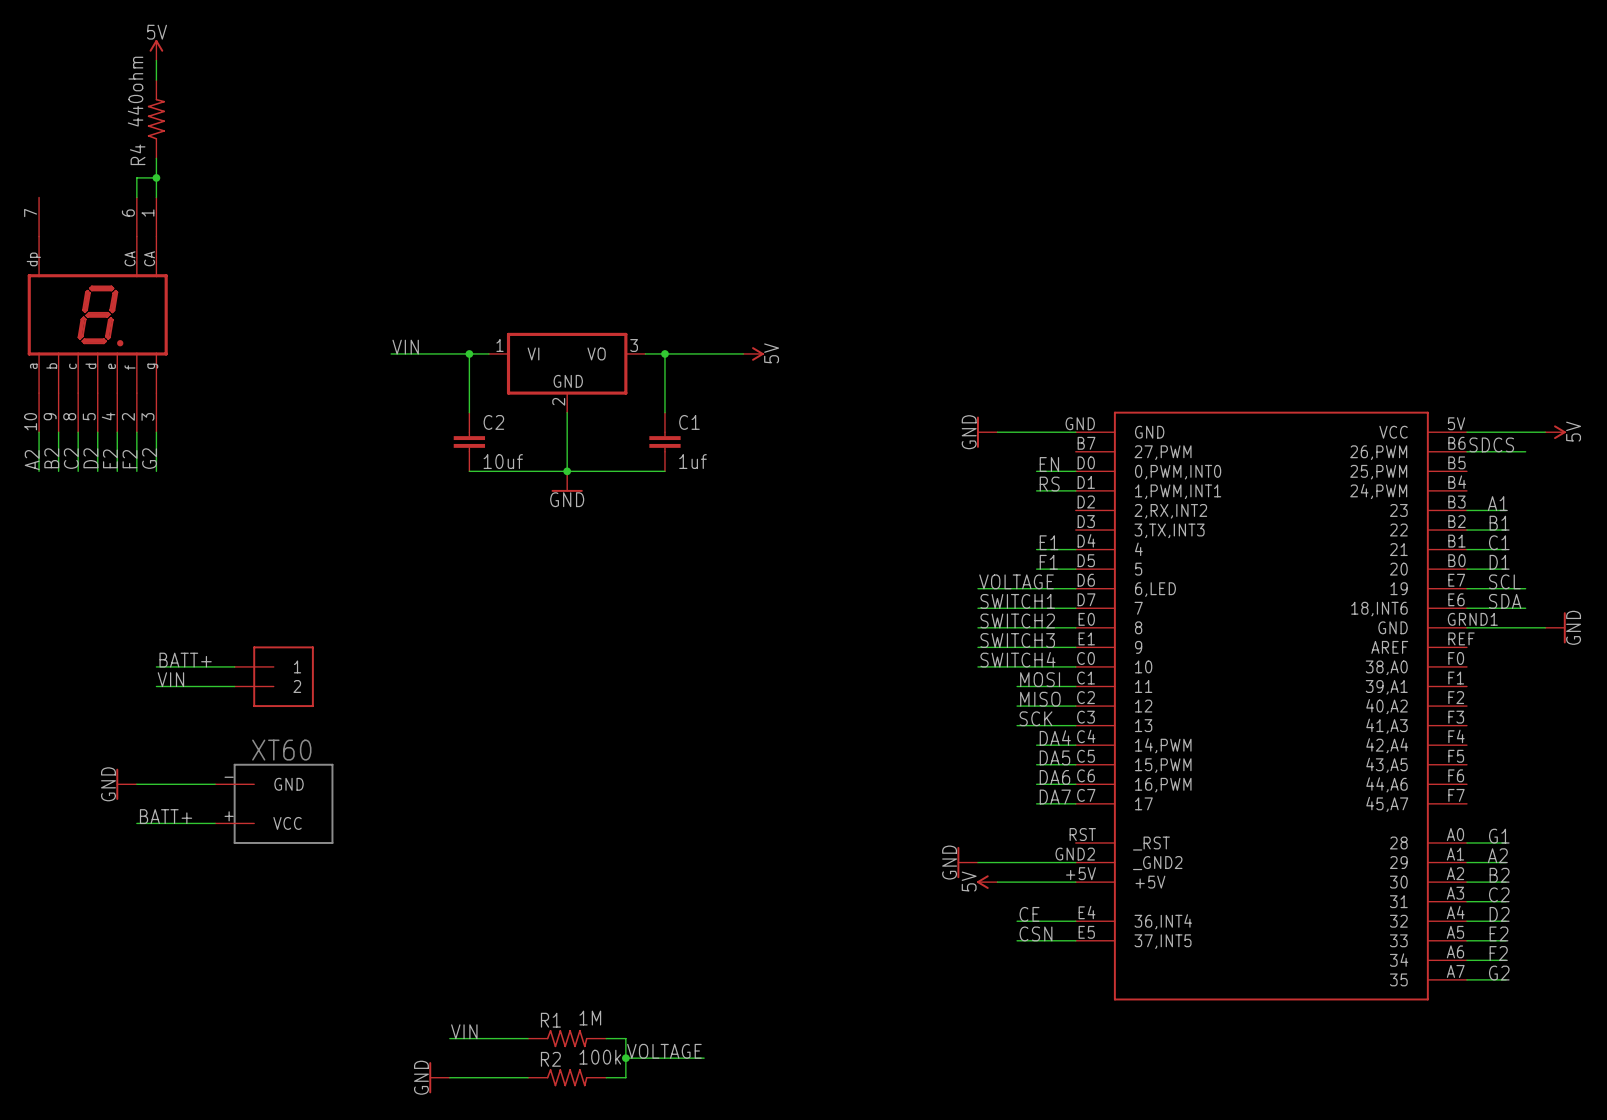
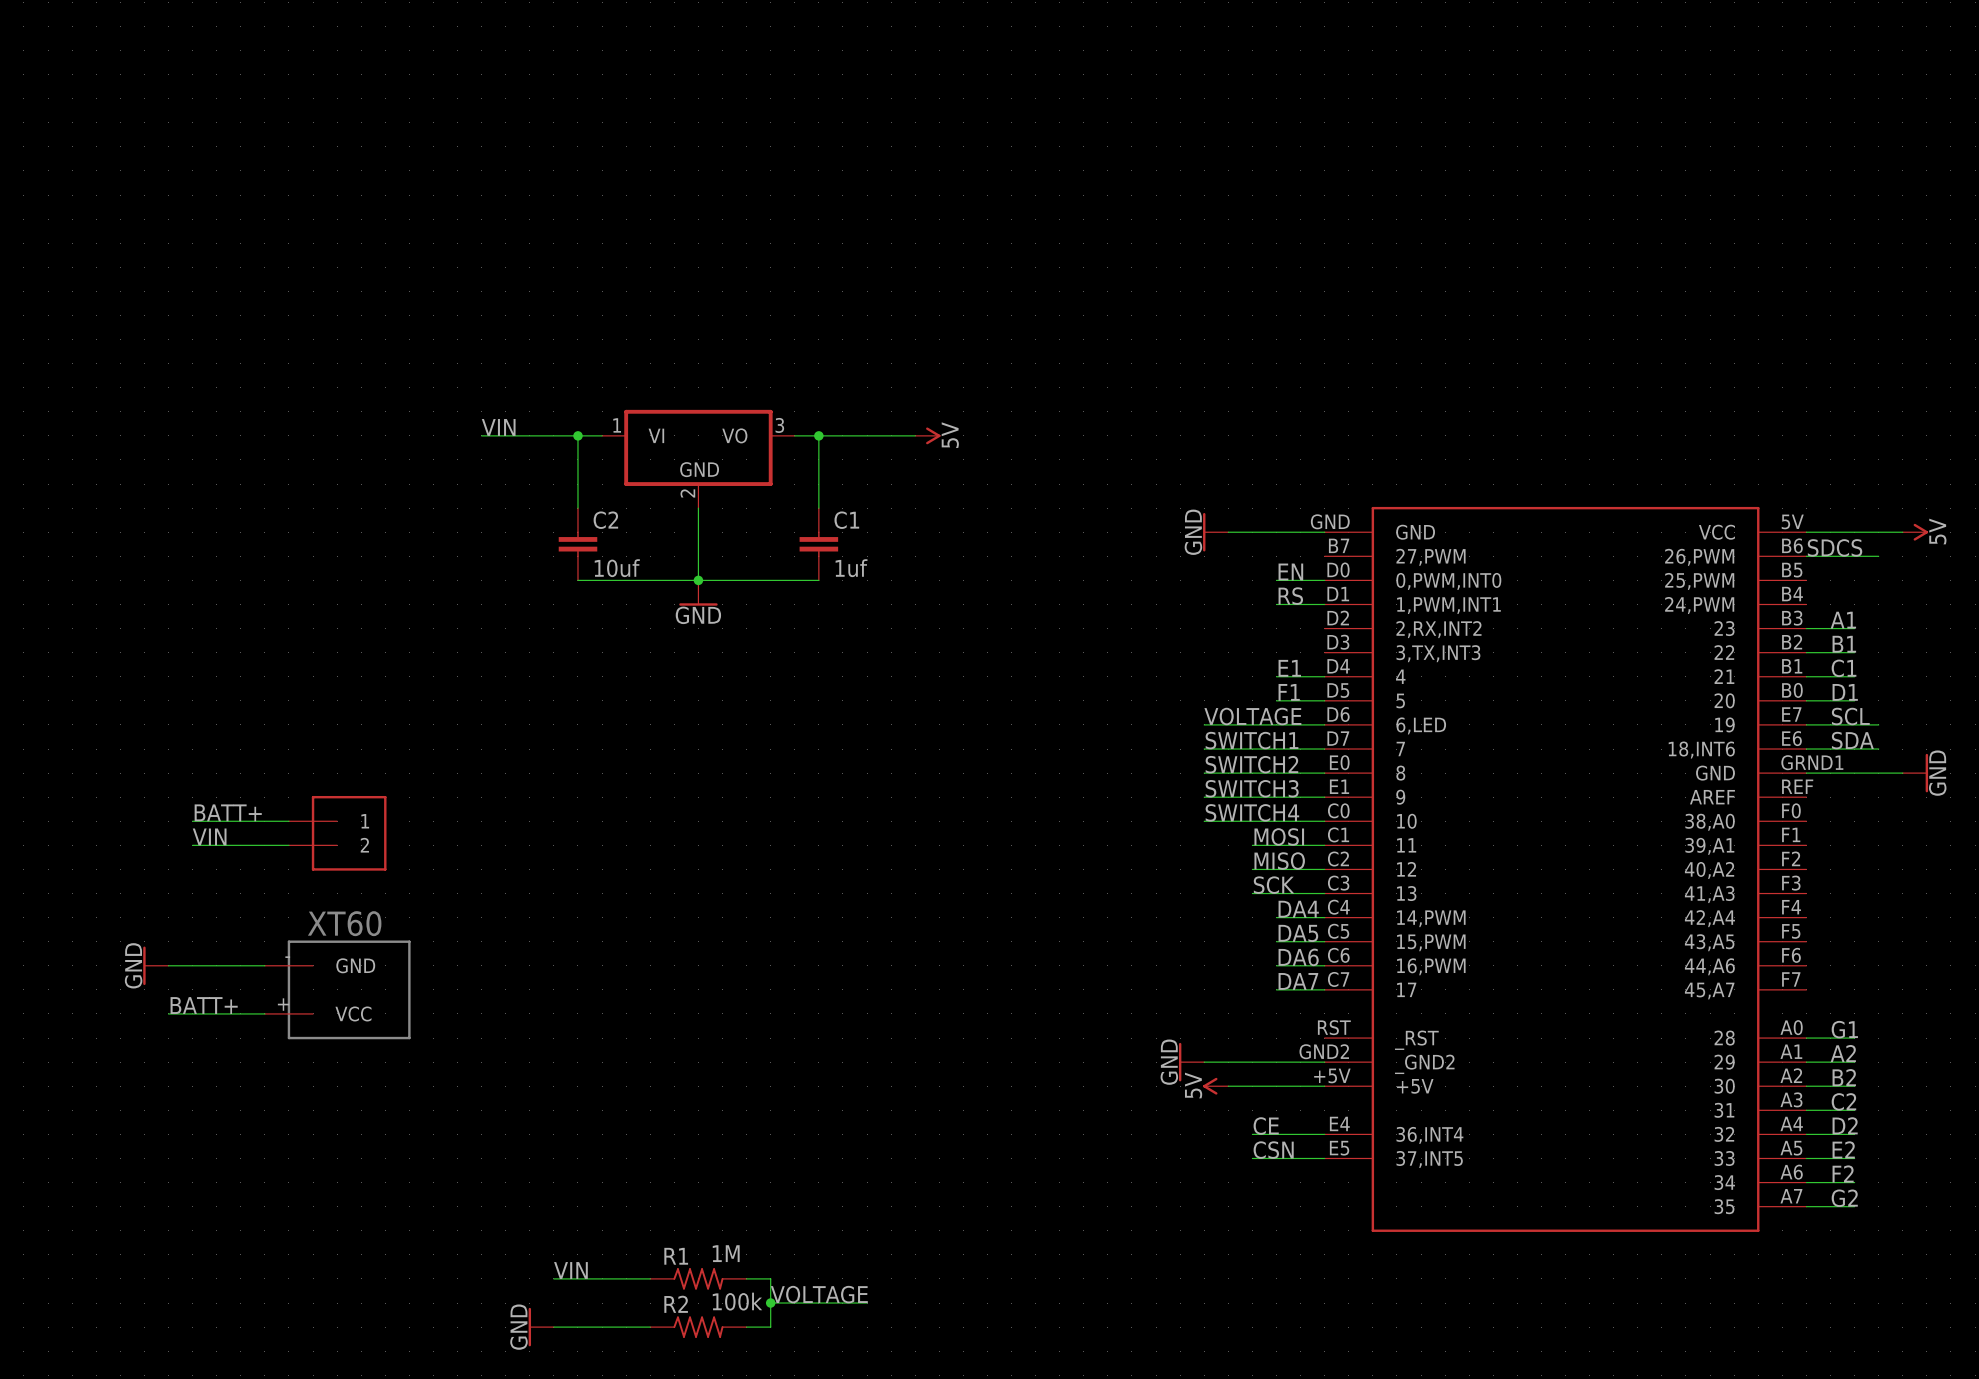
power symbol: 5V (156, 50) -> none
wire: (156, 60) (156, 80) -> none
R4: 440ohm (156, 119) -> none
wire: (156, 158) (156, 197) -> none
wire: (156, 177) (136, 177) (136, 197) -> none
junction: (156, 177) -> none
part: (97, 314) -> none
wire: (39, 432) (39, 471) -> none
wire: (58, 432) (58, 471) -> none
wire: (78, 432) (78, 471) -> none
wire: (97, 432) (97, 471) -> none
wire: (117, 432) (117, 471) -> none
wire: (136, 432) (136, 471) -> none
wire: (156, 432) (156, 471) -> none
label: B2 (51, 458) -> none
label: C2 (71, 458) -> none
label: D2 (90, 458) -> none
label: E2 (110, 458) -> none
label: G2 (149, 458) -> none
label: F2 (130, 459) -> none
label: A2 (32, 460) -> none

